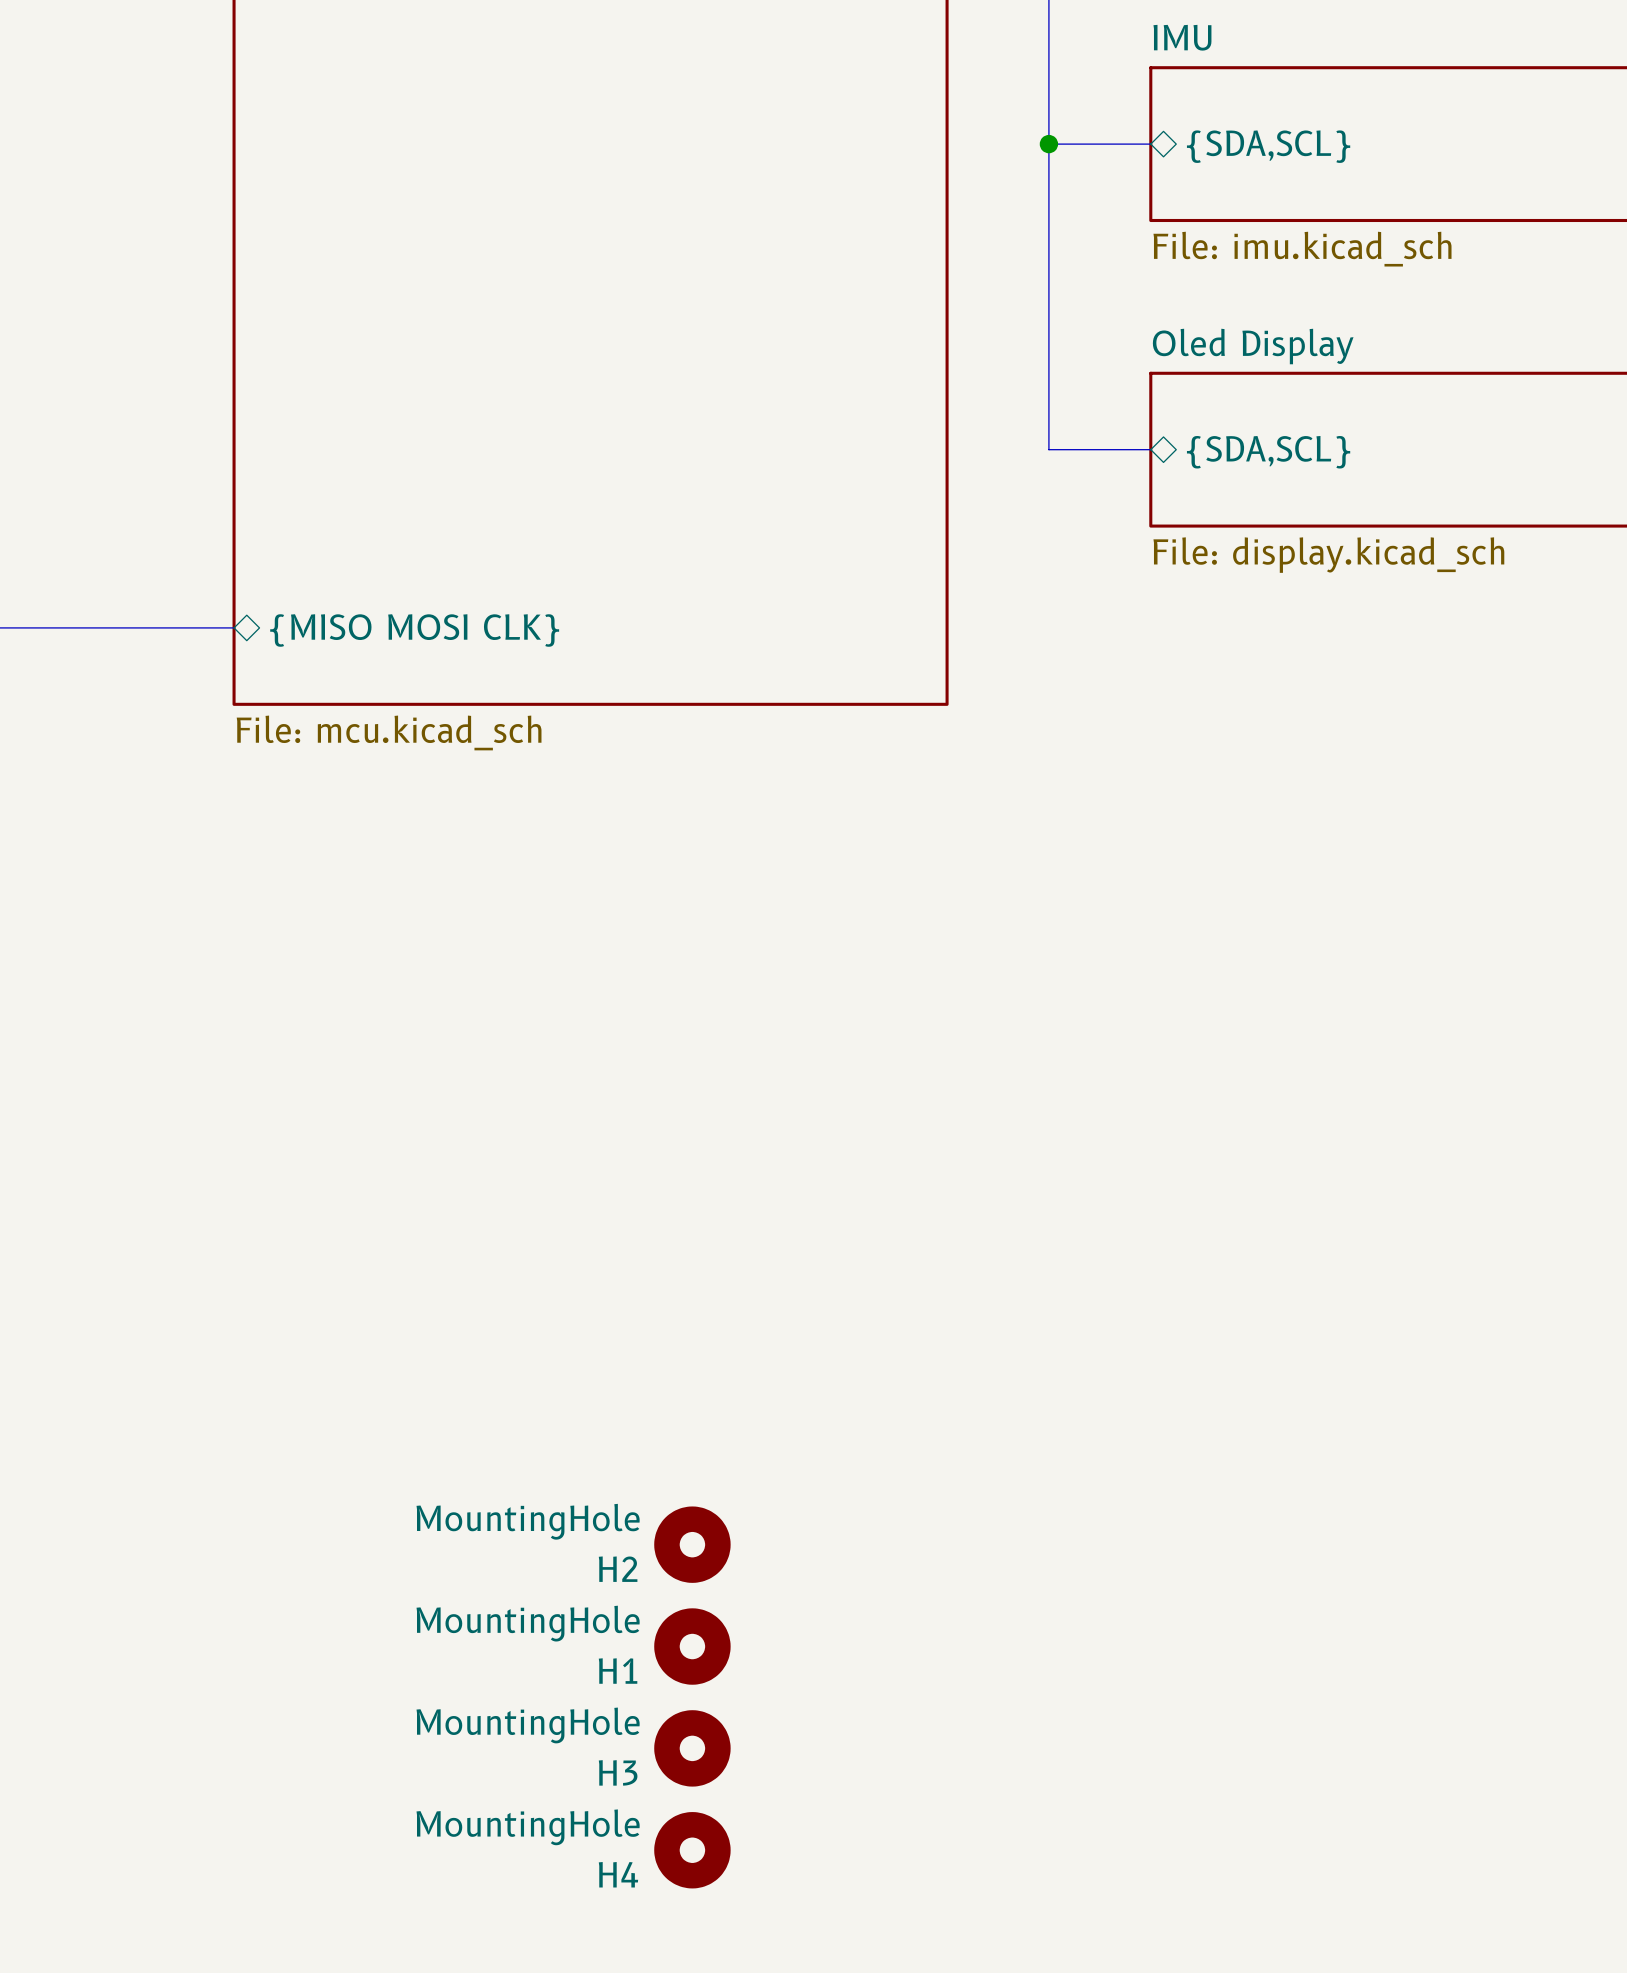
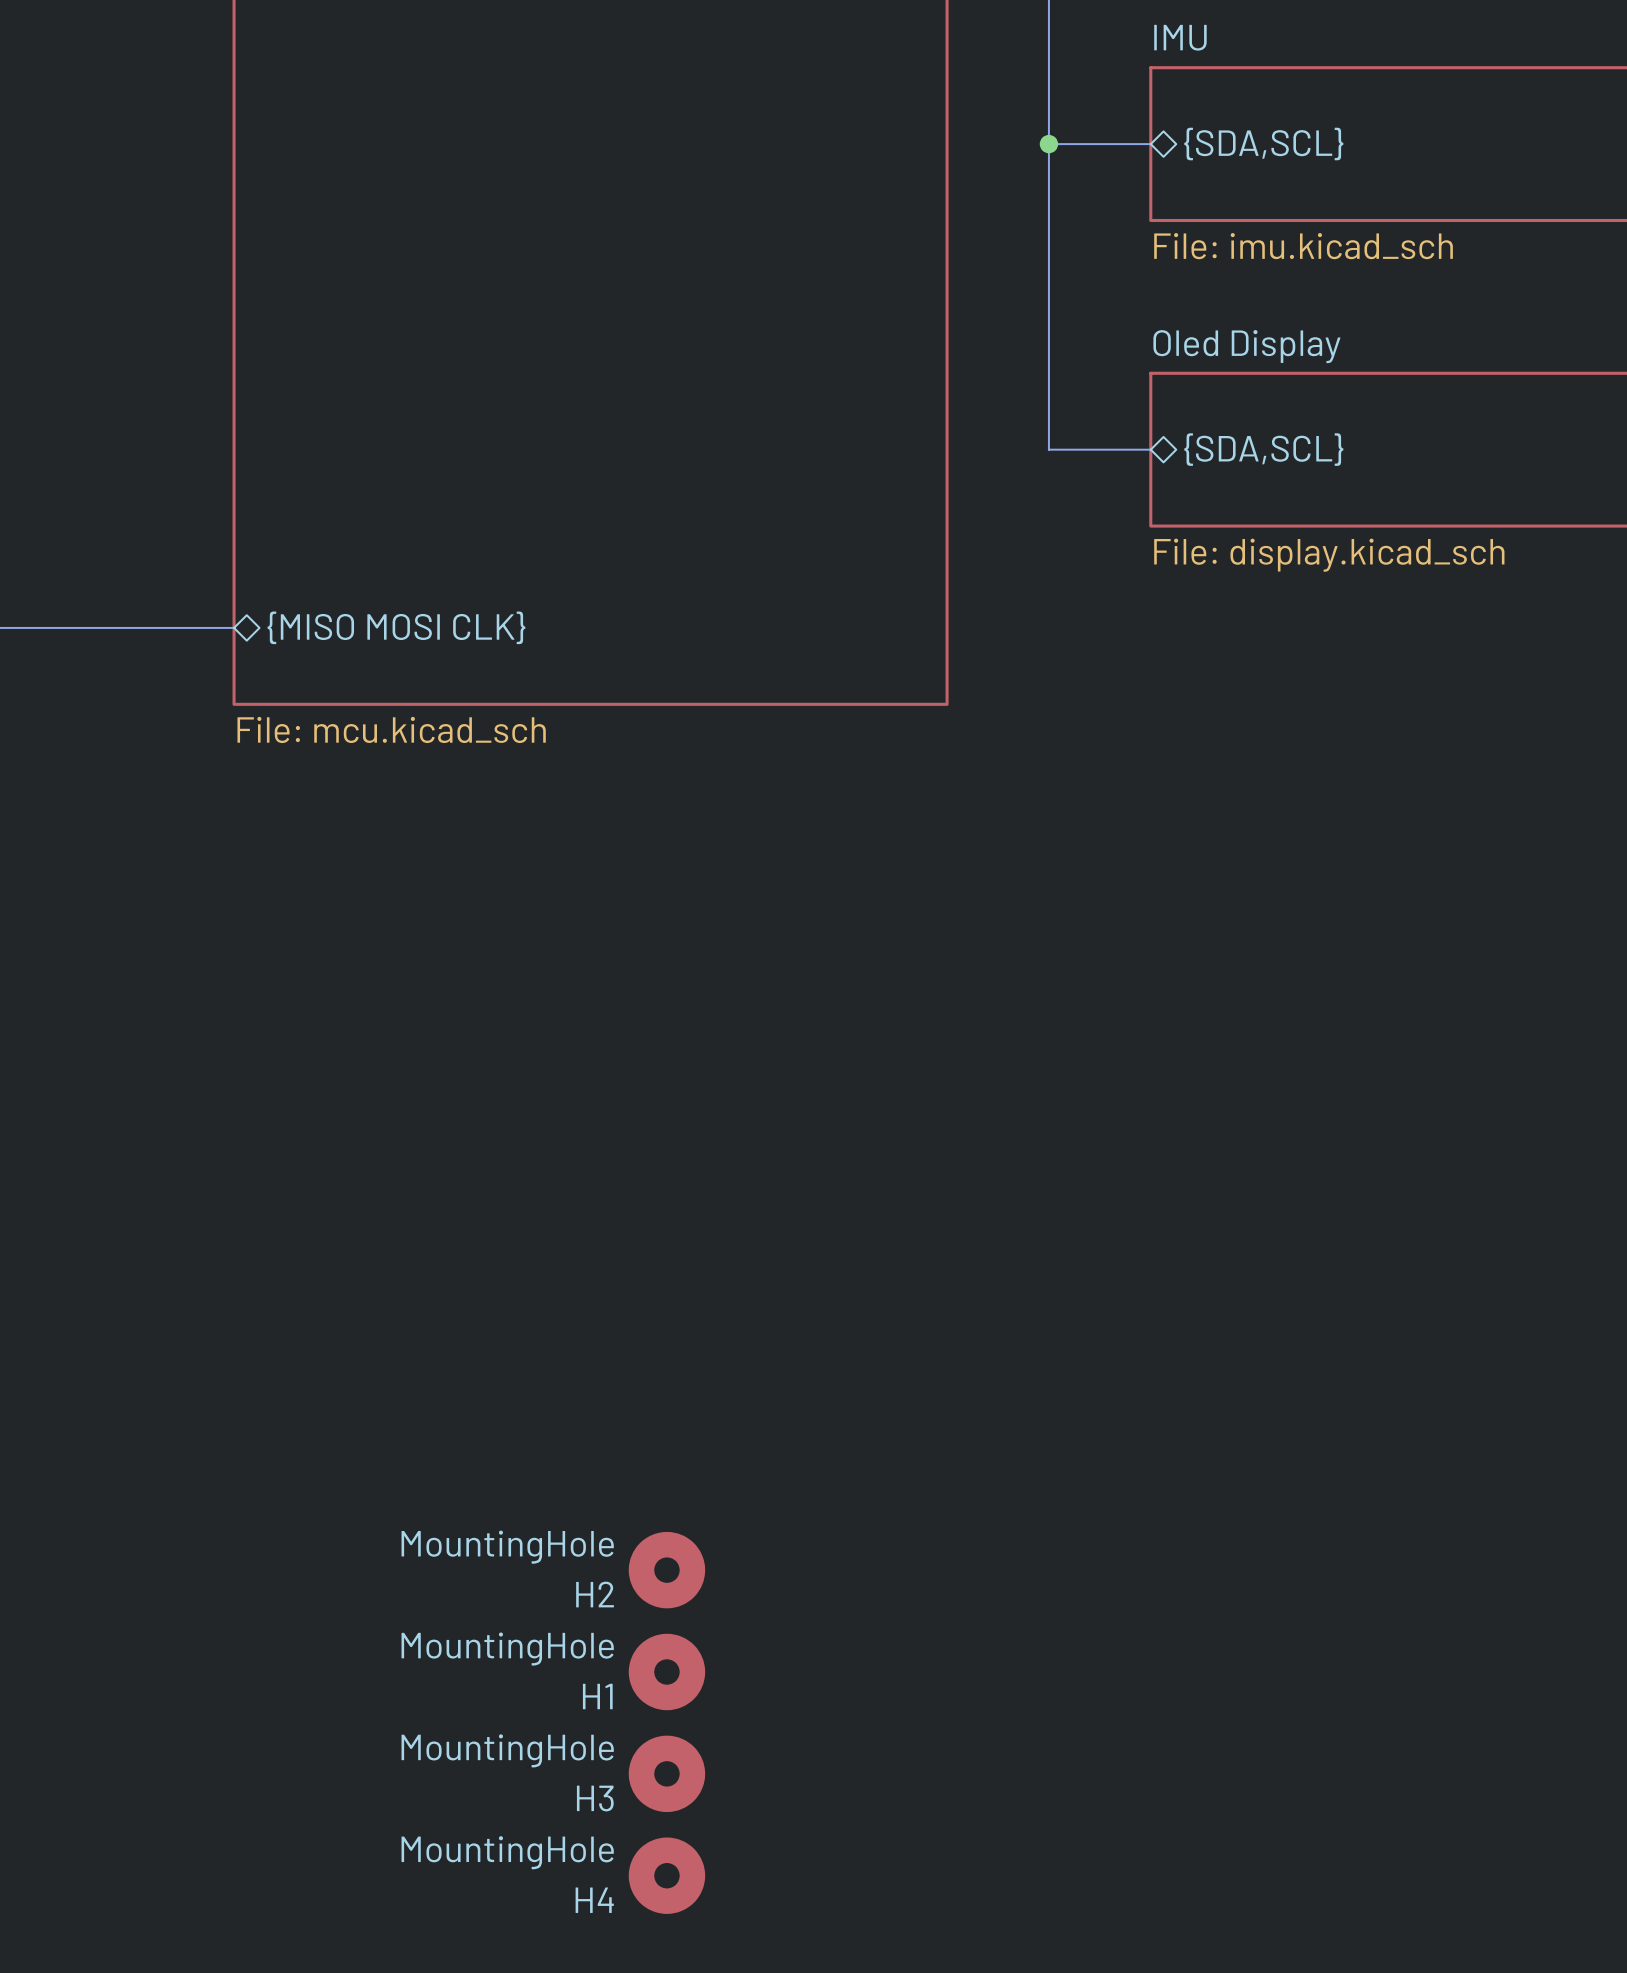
H2 position: (692, 1544) -> (666, 1570)
H1 position: (692, 1646) -> (666, 1671)
H3 position: (692, 1748) -> (666, 1773)
H4 position: (692, 1850) -> (666, 1875)

